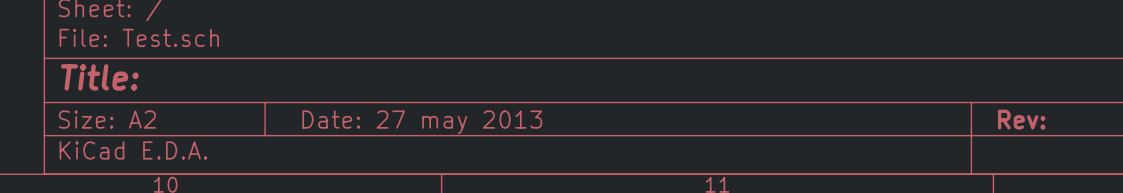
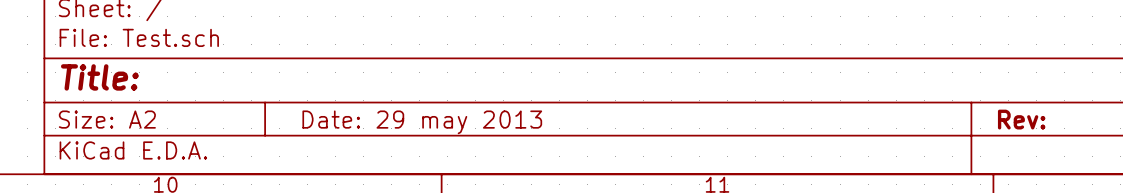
title block: Date: 27 may 2013 (422, 122) -> Date: 29 may 2013 (422, 122)

